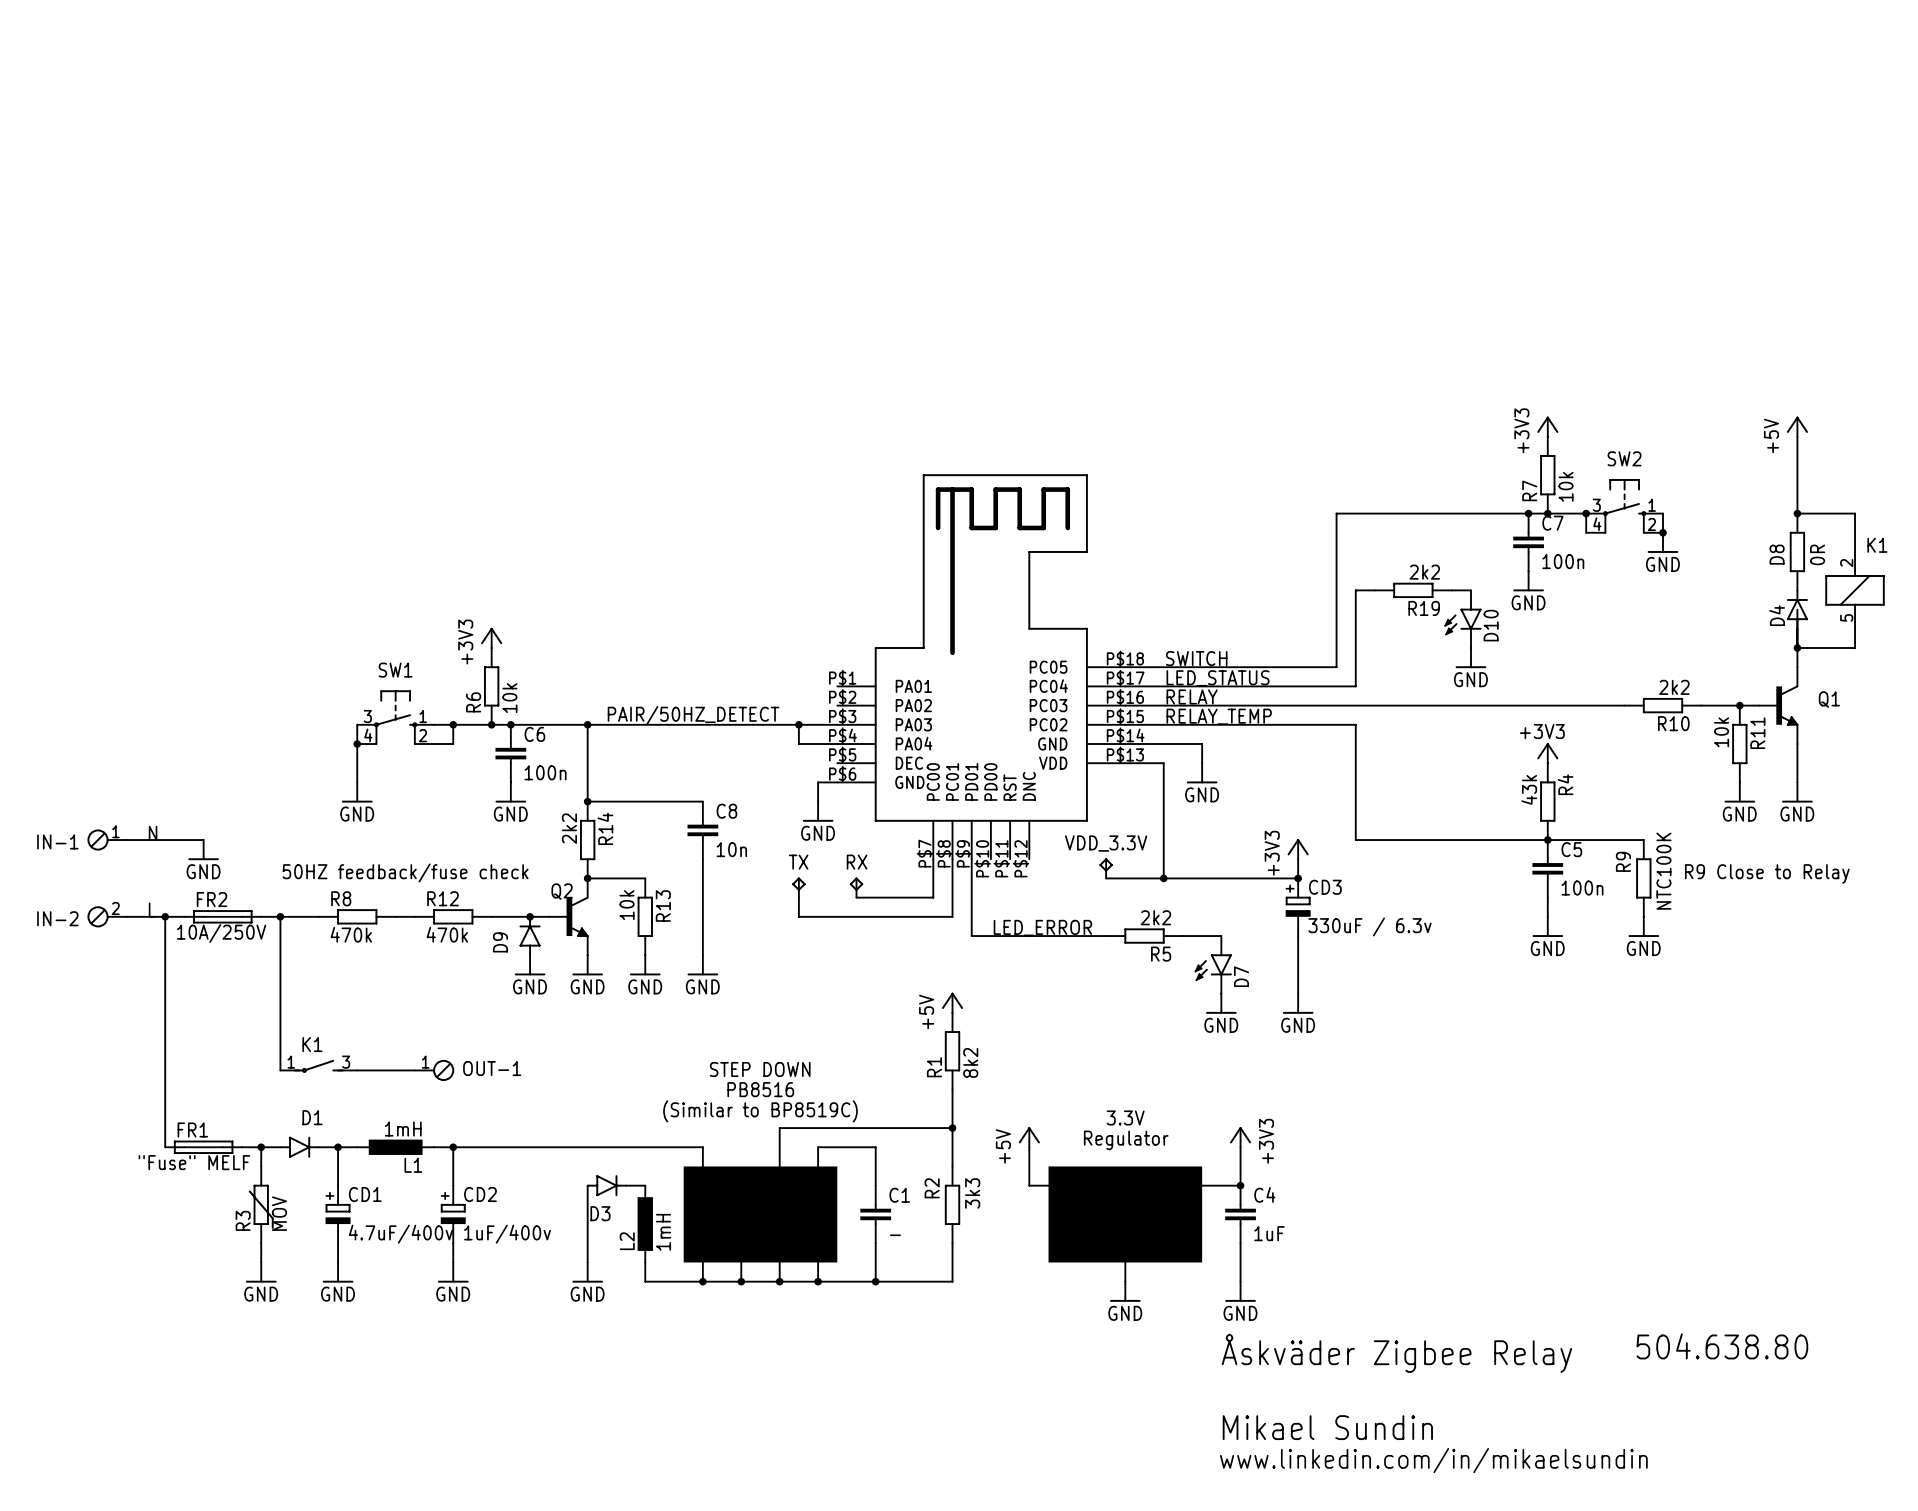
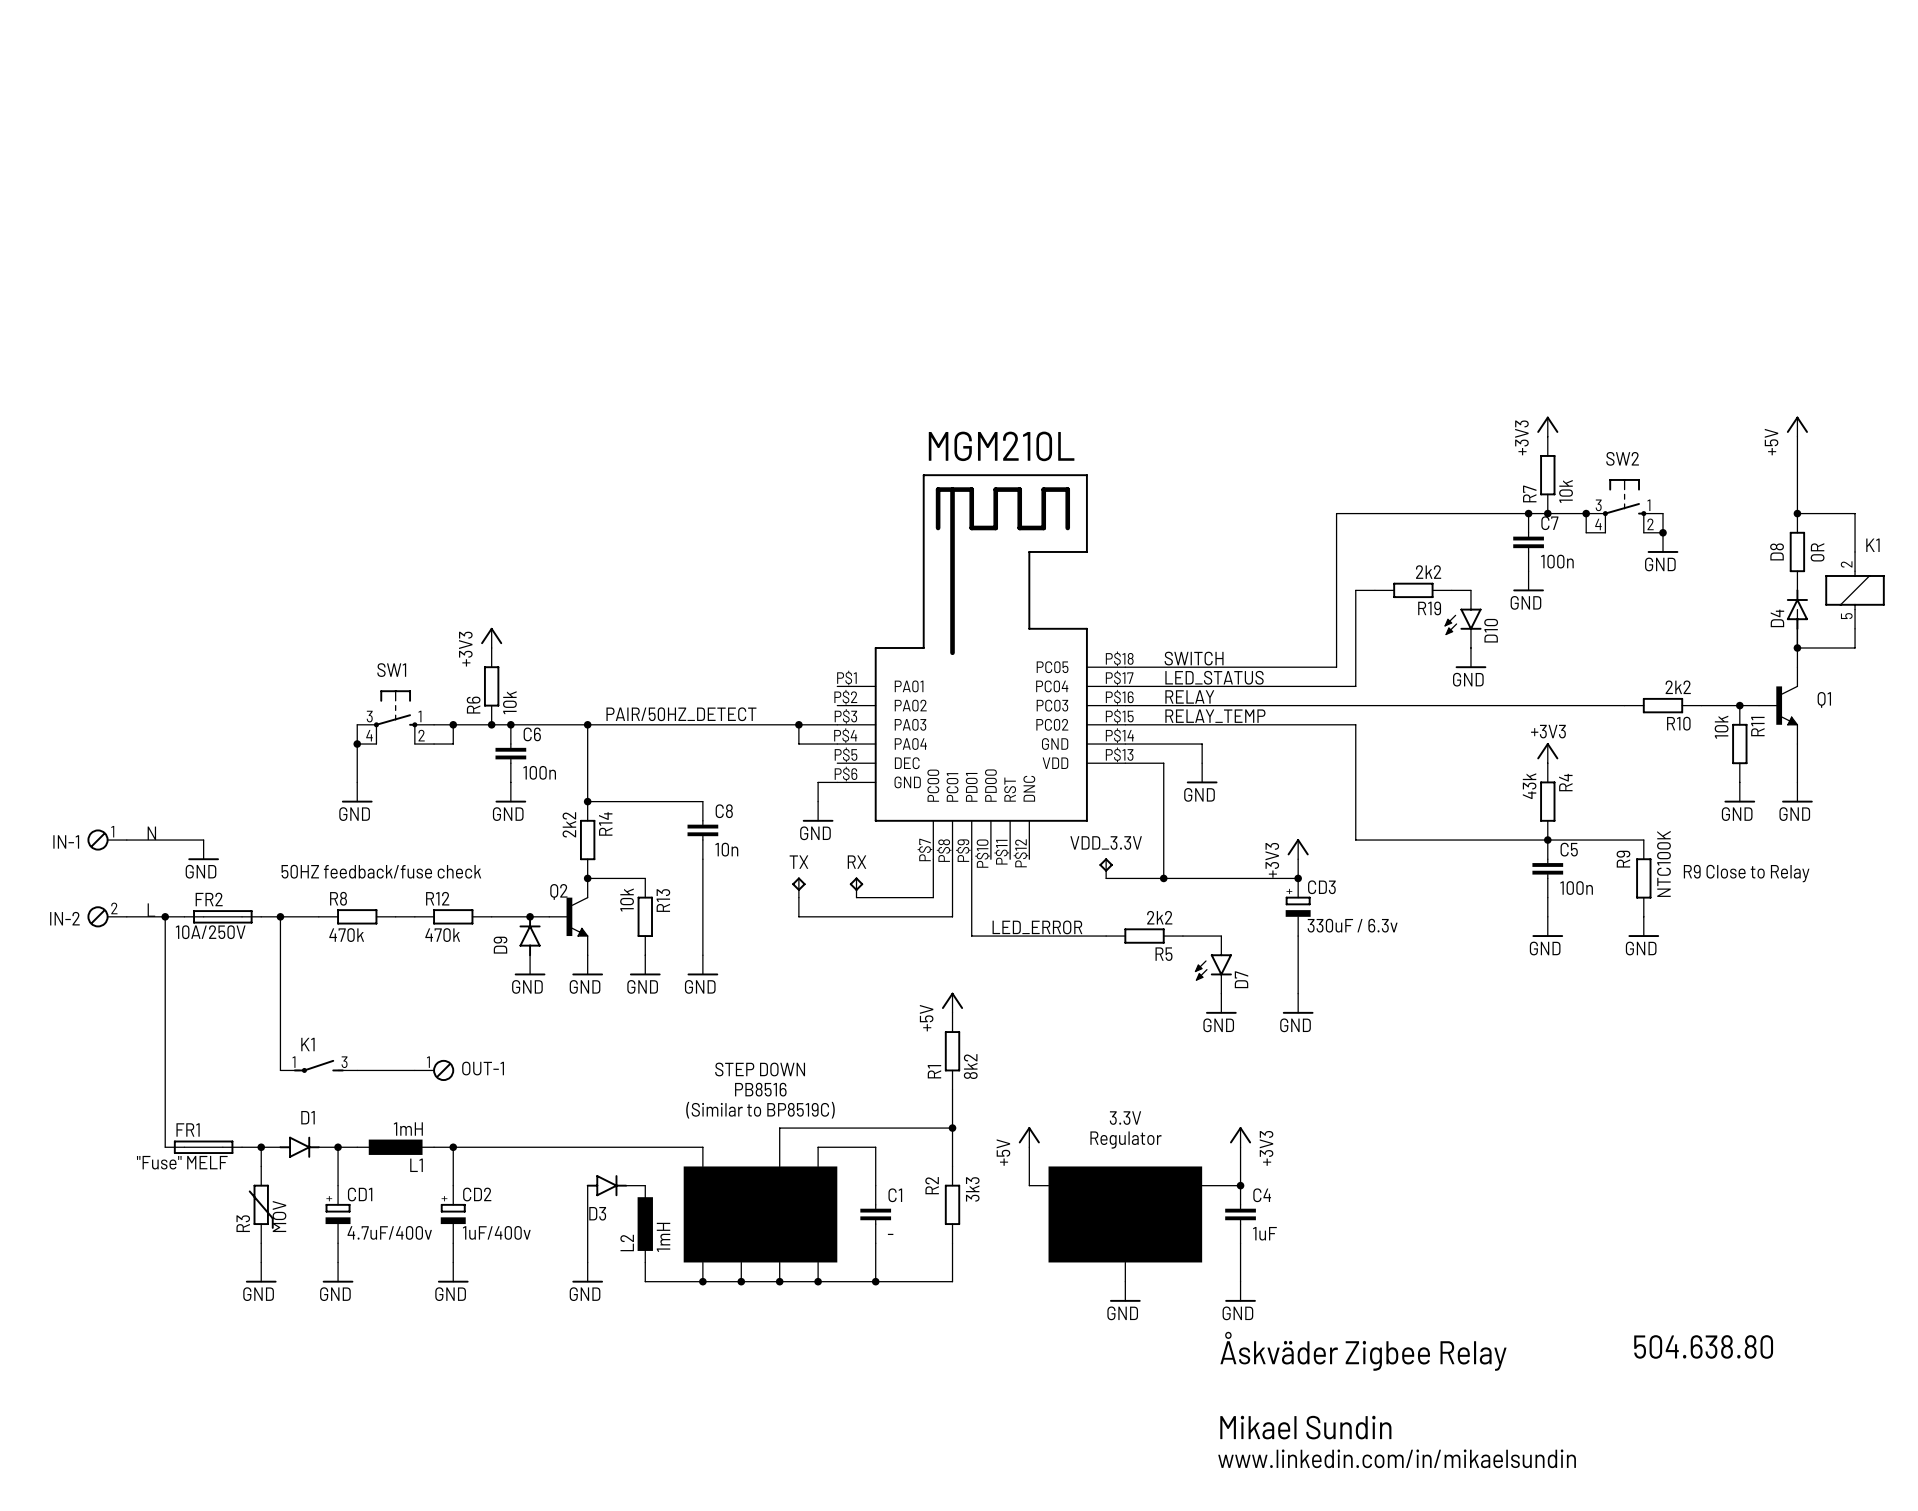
text: none -> MGM210L (1001, 446)

